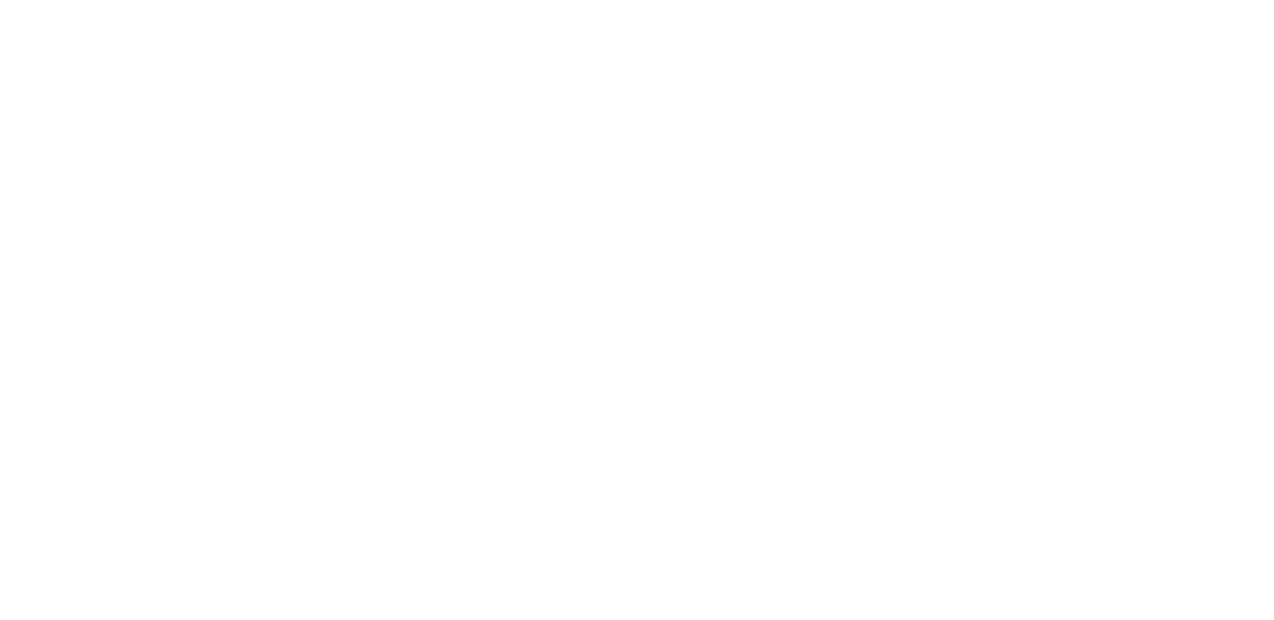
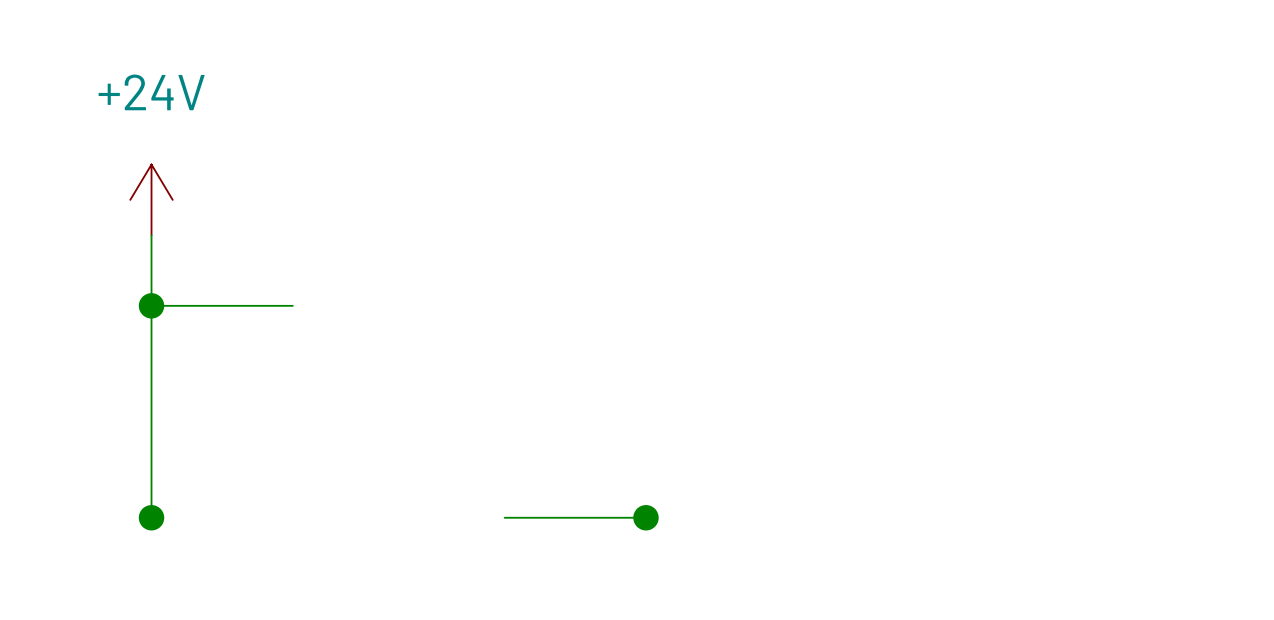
power symbol: none -> +24V (151, 199)
wire: none -> (151, 235) (151, 517)
wire: none -> (151, 305) (292, 305)
junction: none -> (151, 305)
junction: none -> (151, 517)
wire: none -> (504, 517) (645, 517)
junction: none -> (645, 517)

